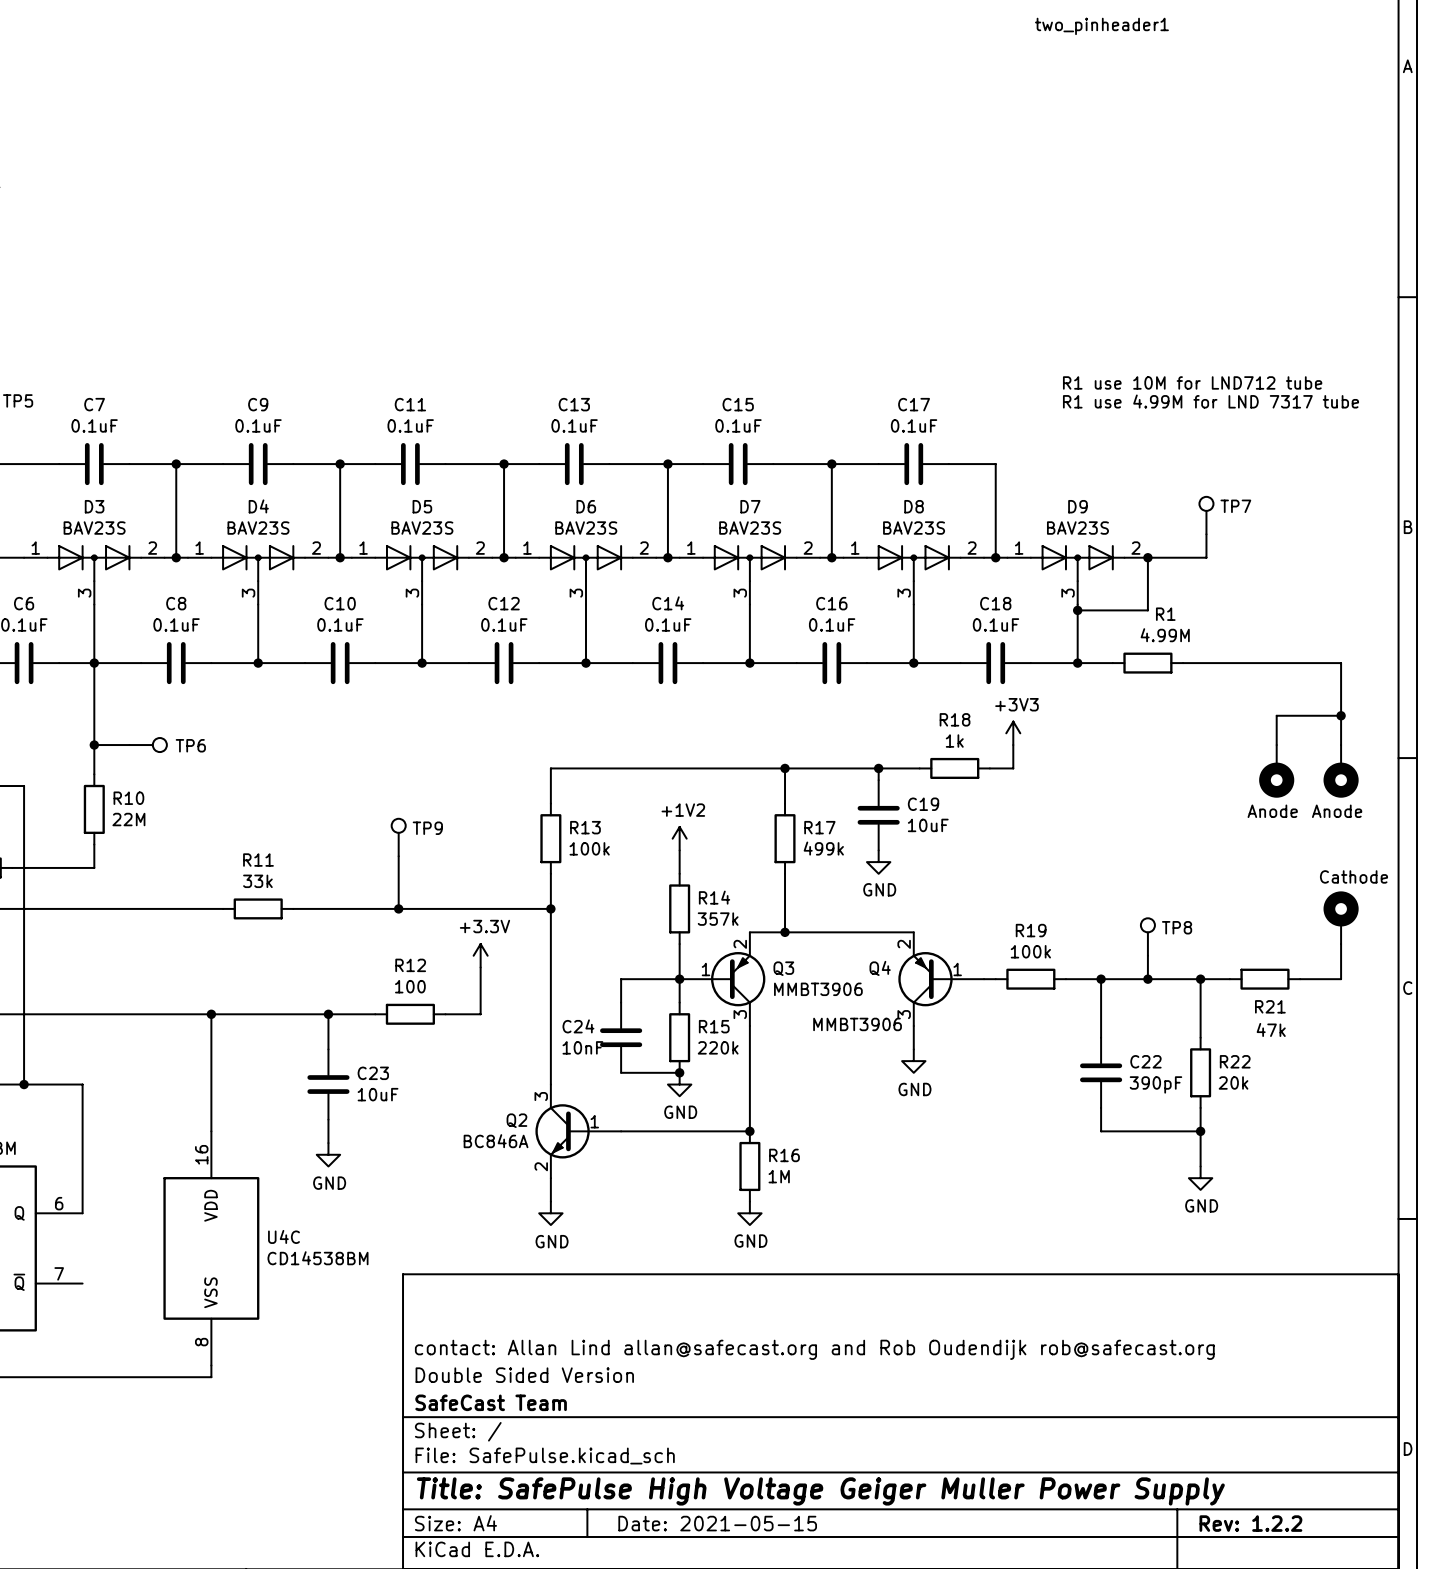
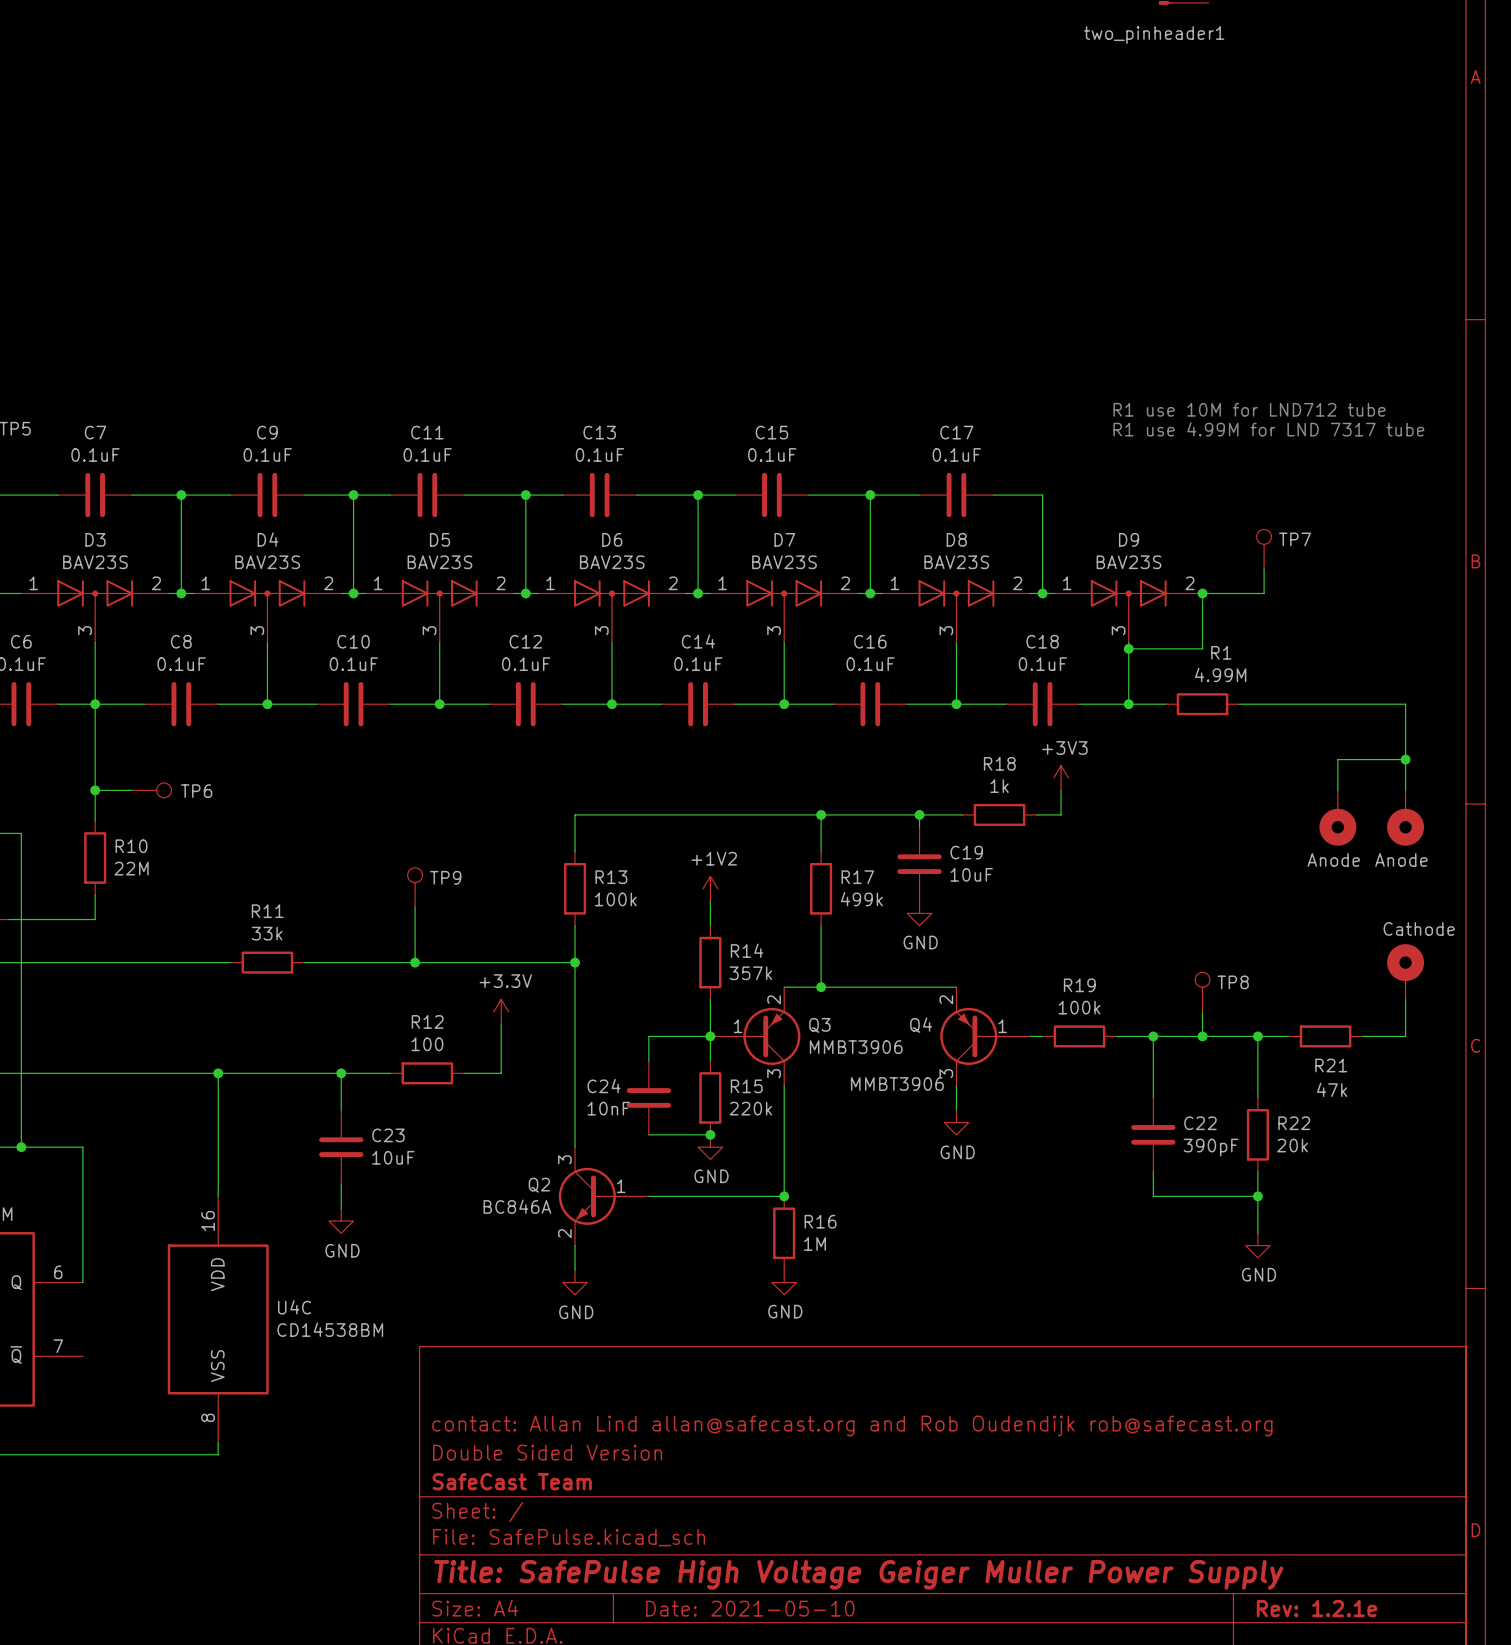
title block: Date: 2021-05-15 (717, 1523) -> Date: 2021-05-10 (750, 1608)
title block: Rev: 1.2.2 (1250, 1523) -> Rev: 1.2.1e (1317, 1608)

